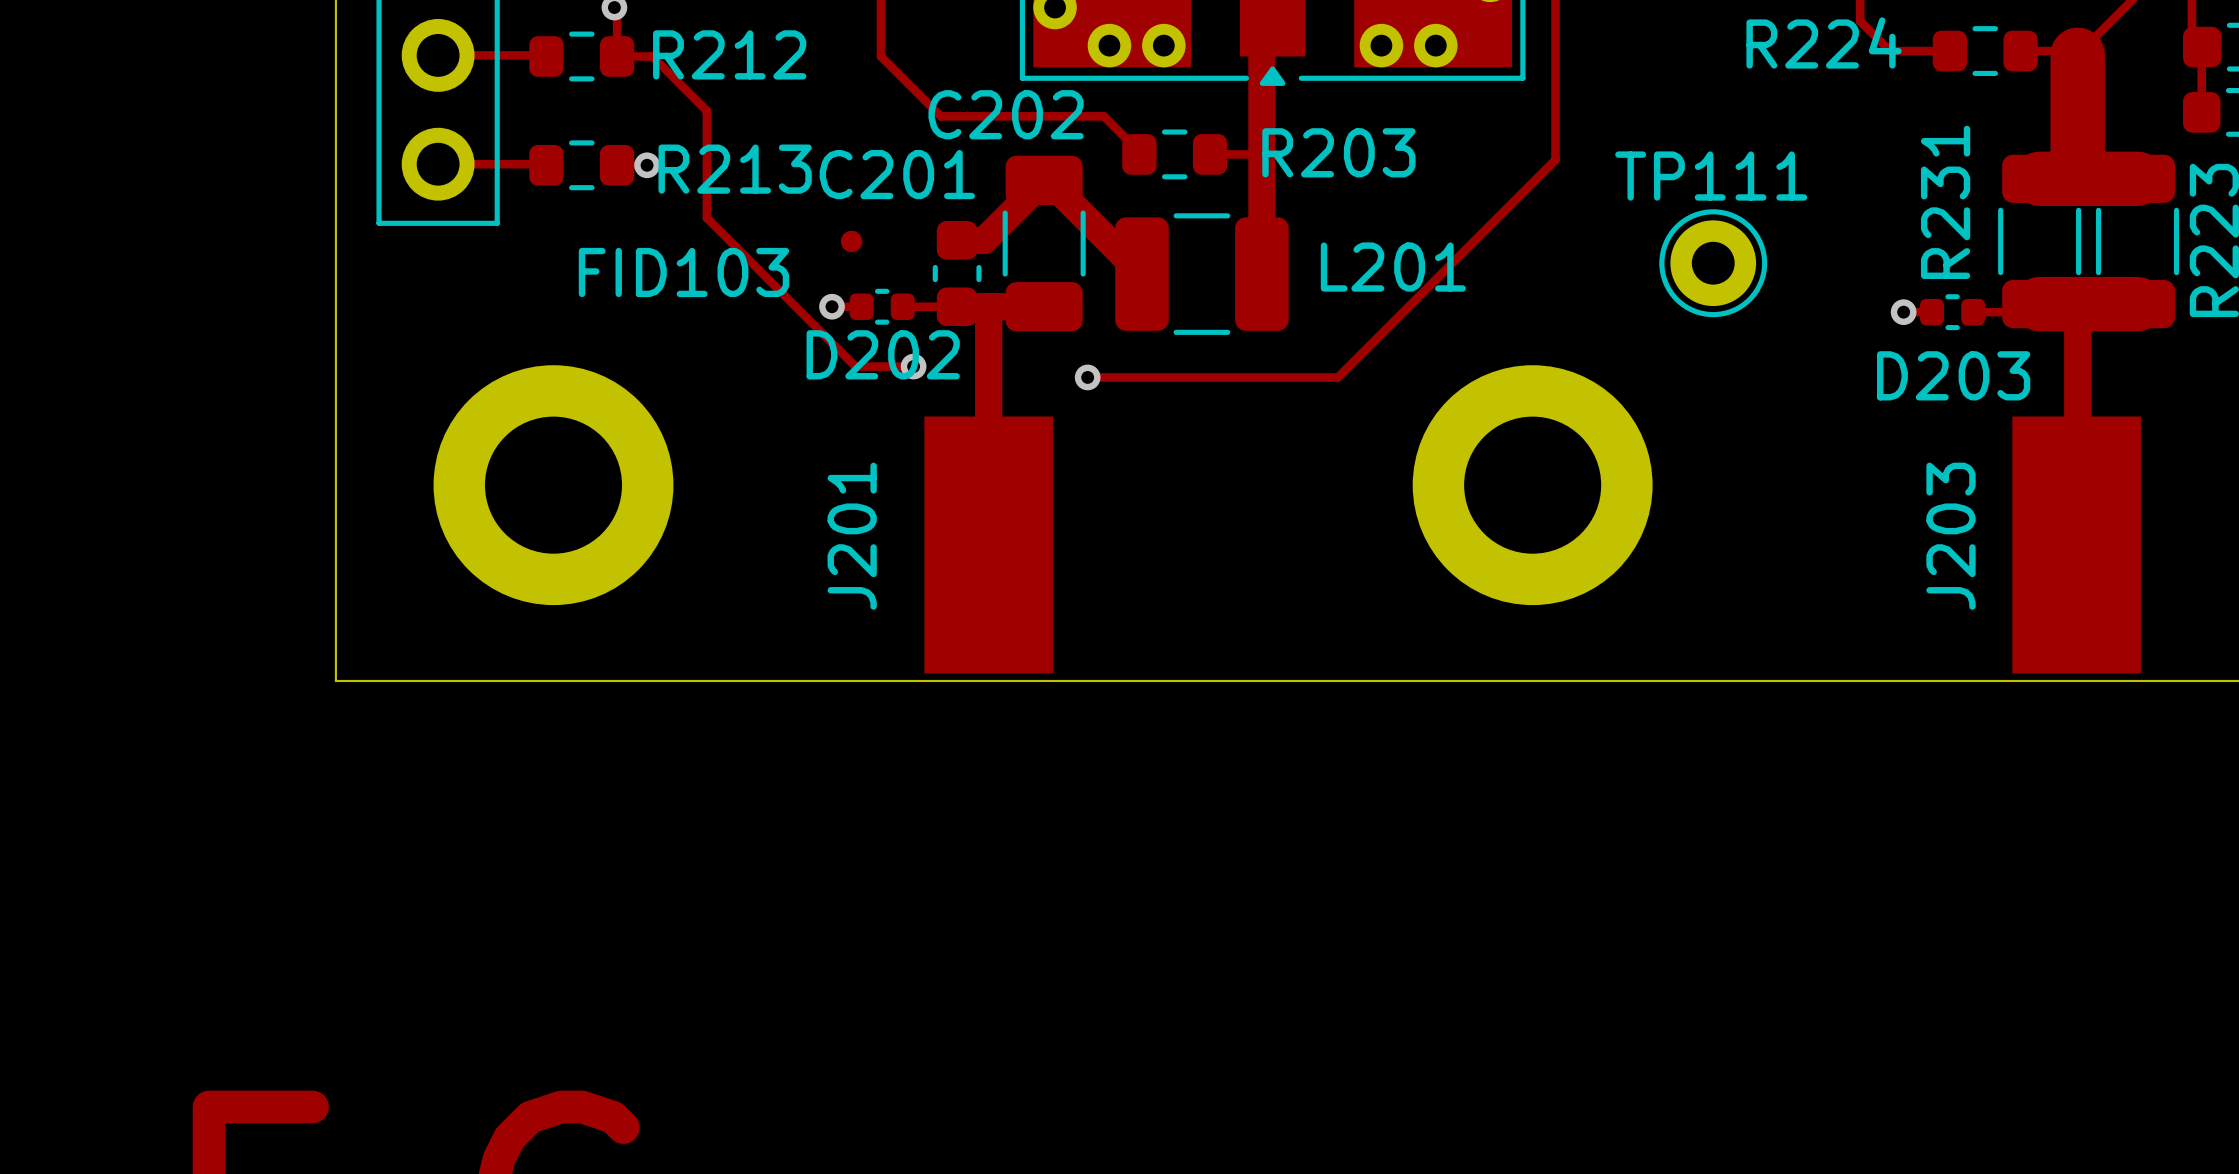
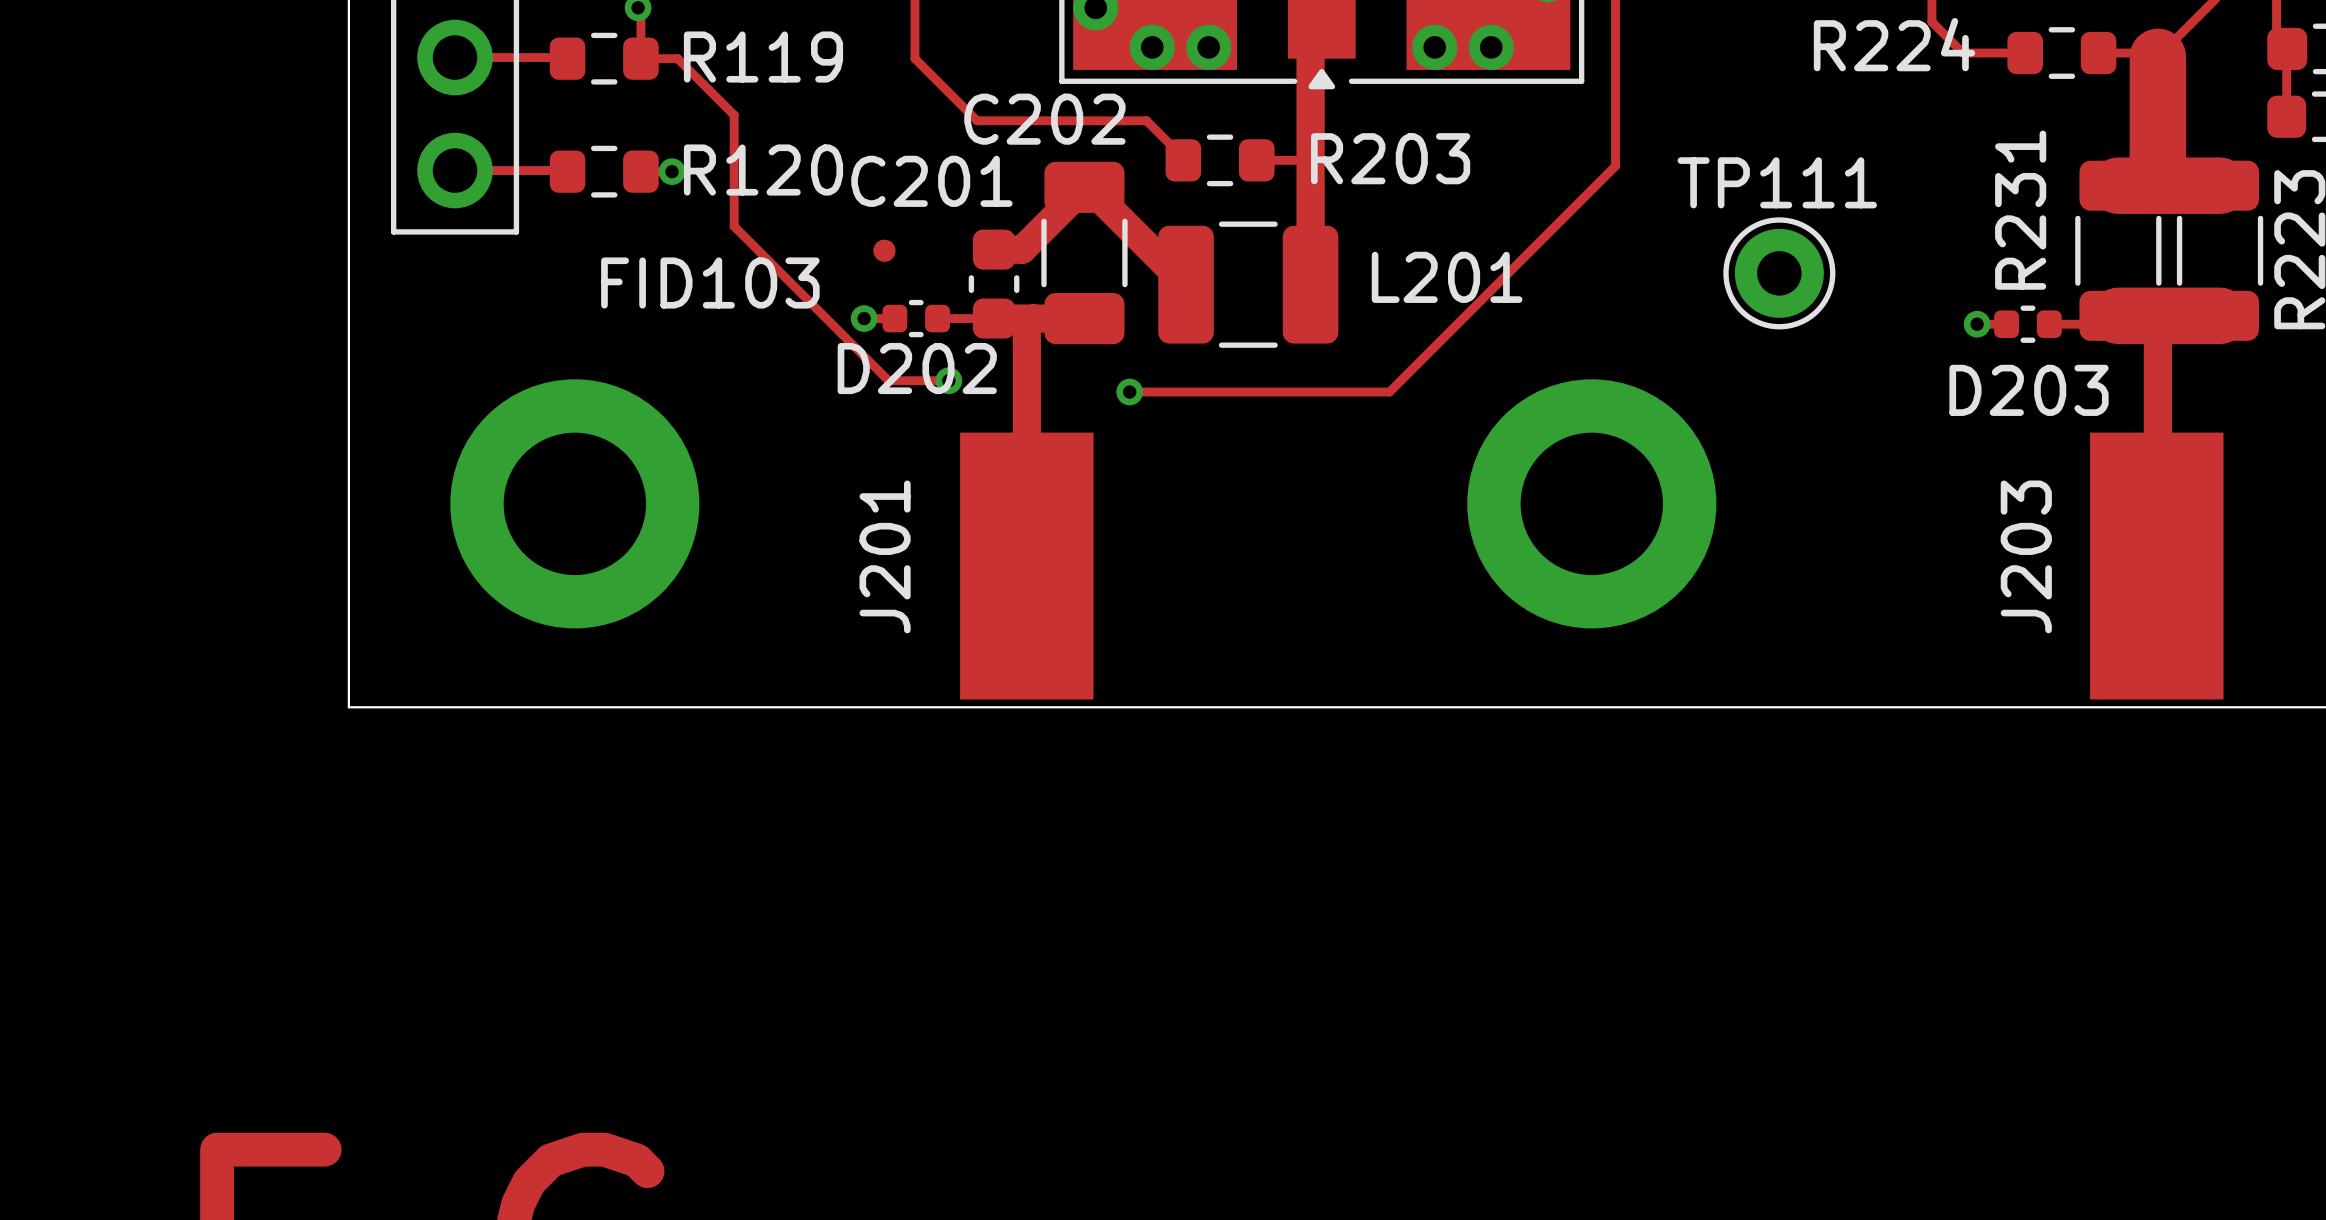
R212 name: R212 (729, 54) -> R119 (763, 57)
R213 name: R213 (735, 169) -> R120 (763, 170)

